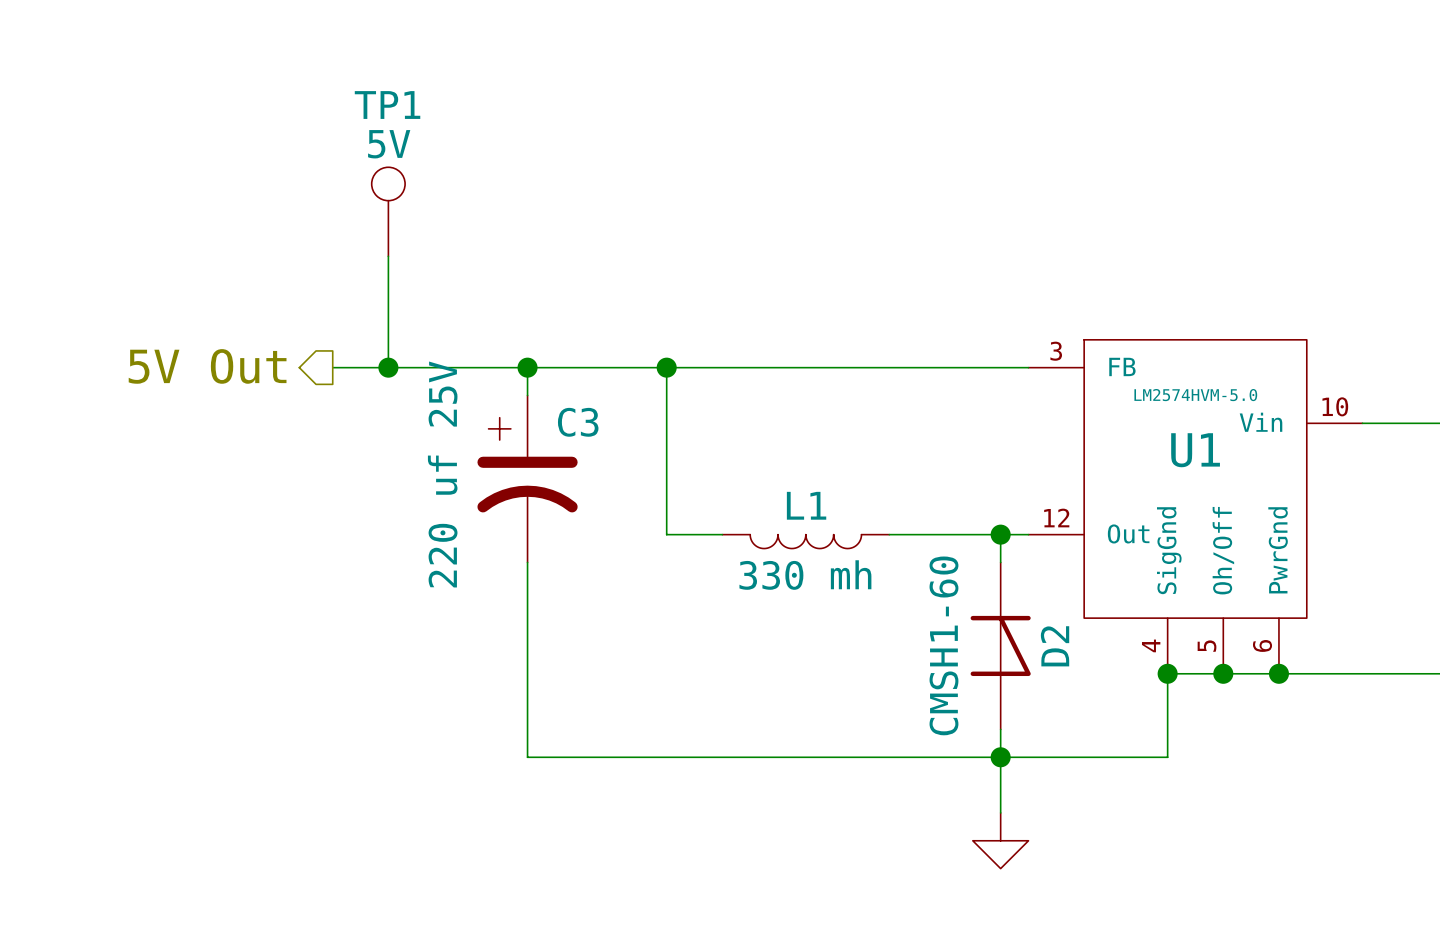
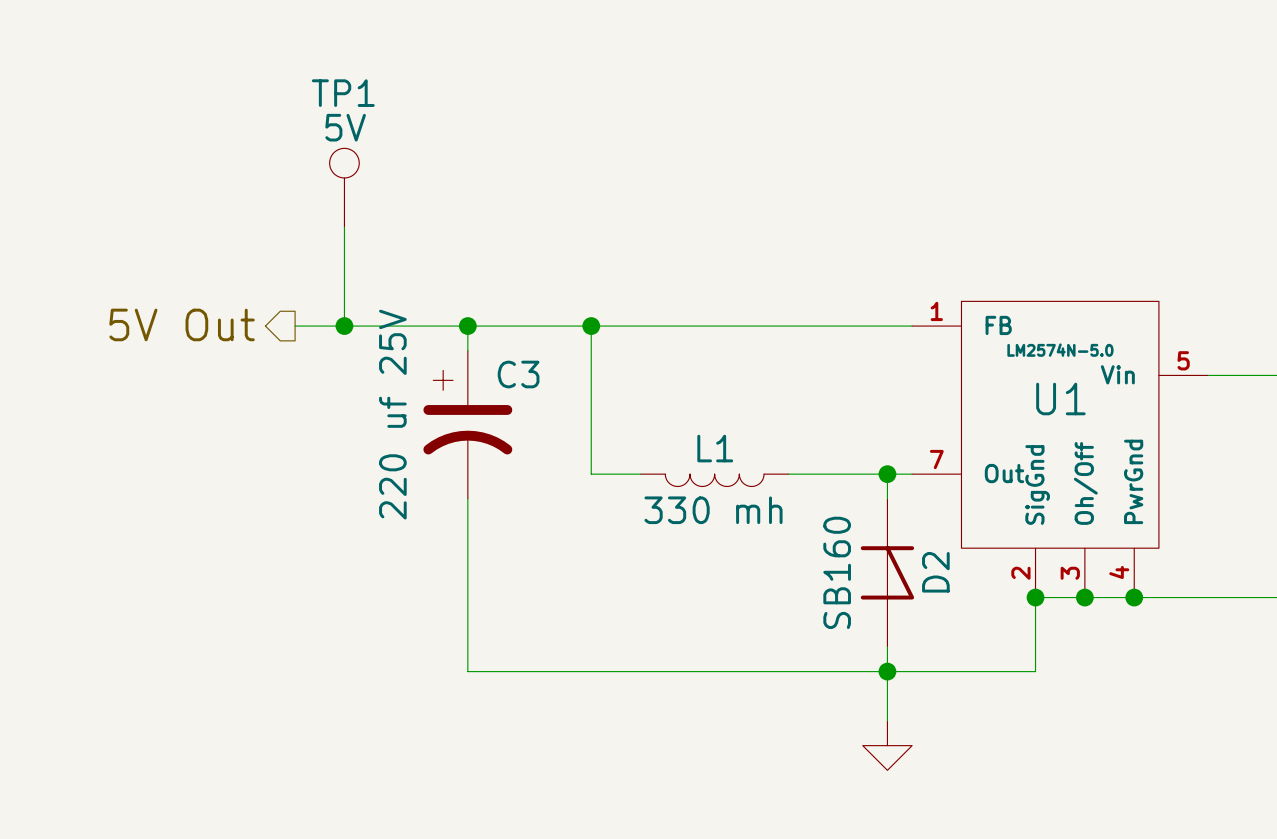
U1 pin number: 3 (1056, 351) -> 1 (936, 311)
U1 value: LM2574HVM-5.0 (1195, 395) -> LM2574N-5.0 (1060, 350)
U1 pin number: 10 (1335, 406) -> 5 (1183, 360)
U1 pin number: 12 (1056, 518) -> 7 (936, 459)
D2 value: CMSH1-60 (943, 645) -> SB160 (837, 572)
U1 pin number: 4 (1151, 645) -> 2 (1020, 573)
U1 pin number: 6 (1262, 645) -> 4 (1119, 572)
U1 pin number: 5 (1207, 646) -> 3 (1070, 573)

